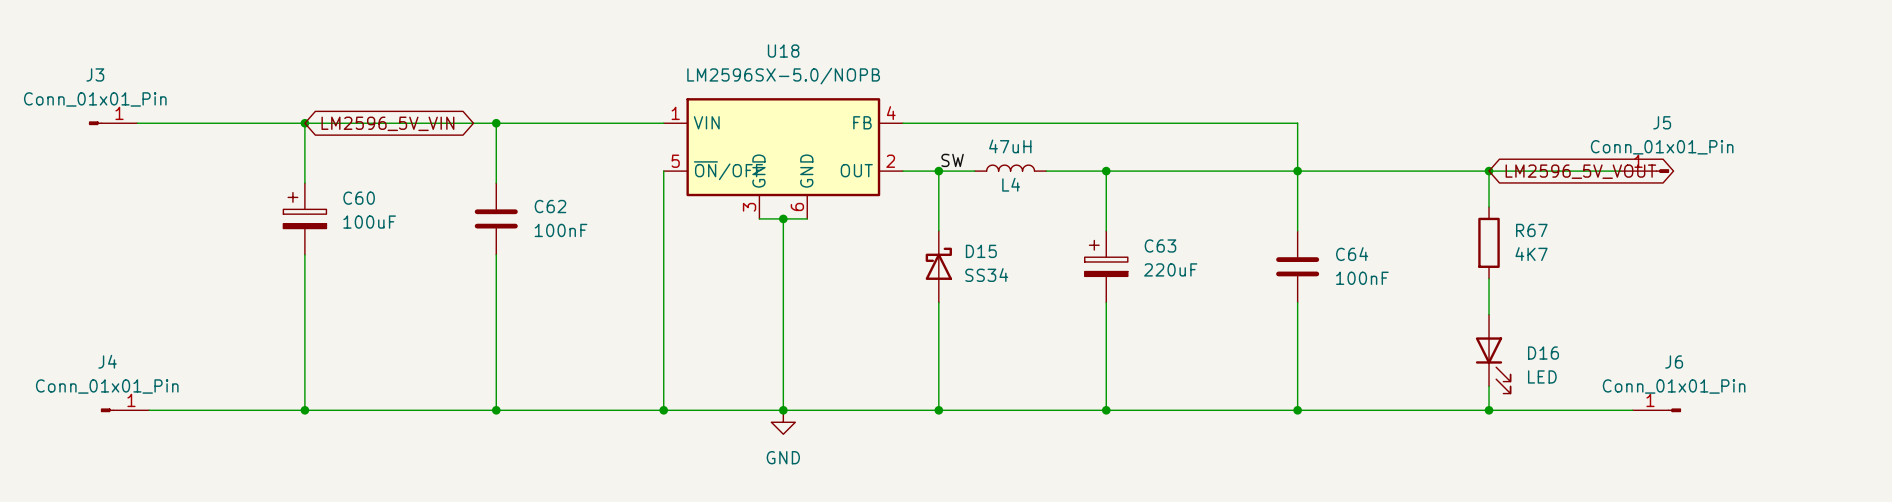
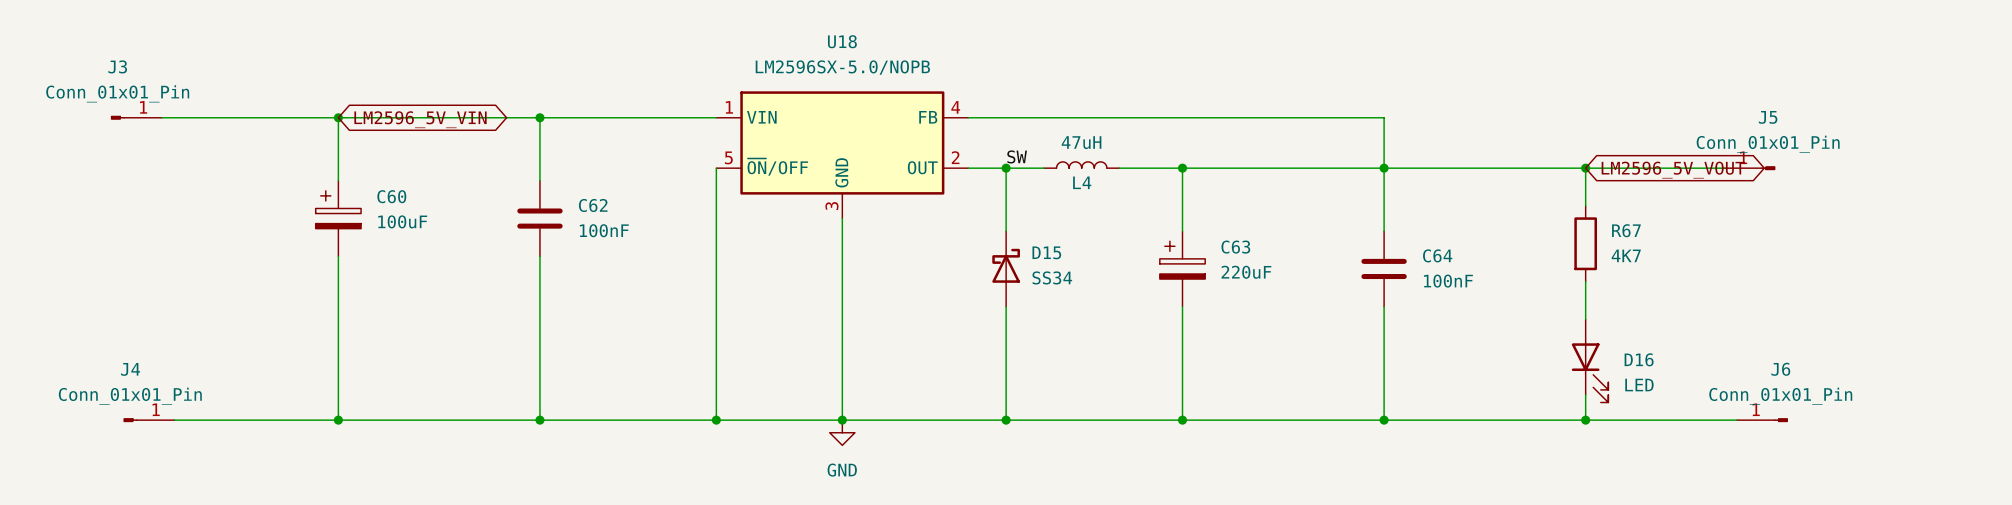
U18 symbol: [663, 98, 903, 219] -> [716, 91, 969, 219]
wire: (759, 218) (807, 218) -> none
junction: (783, 218) -> none

